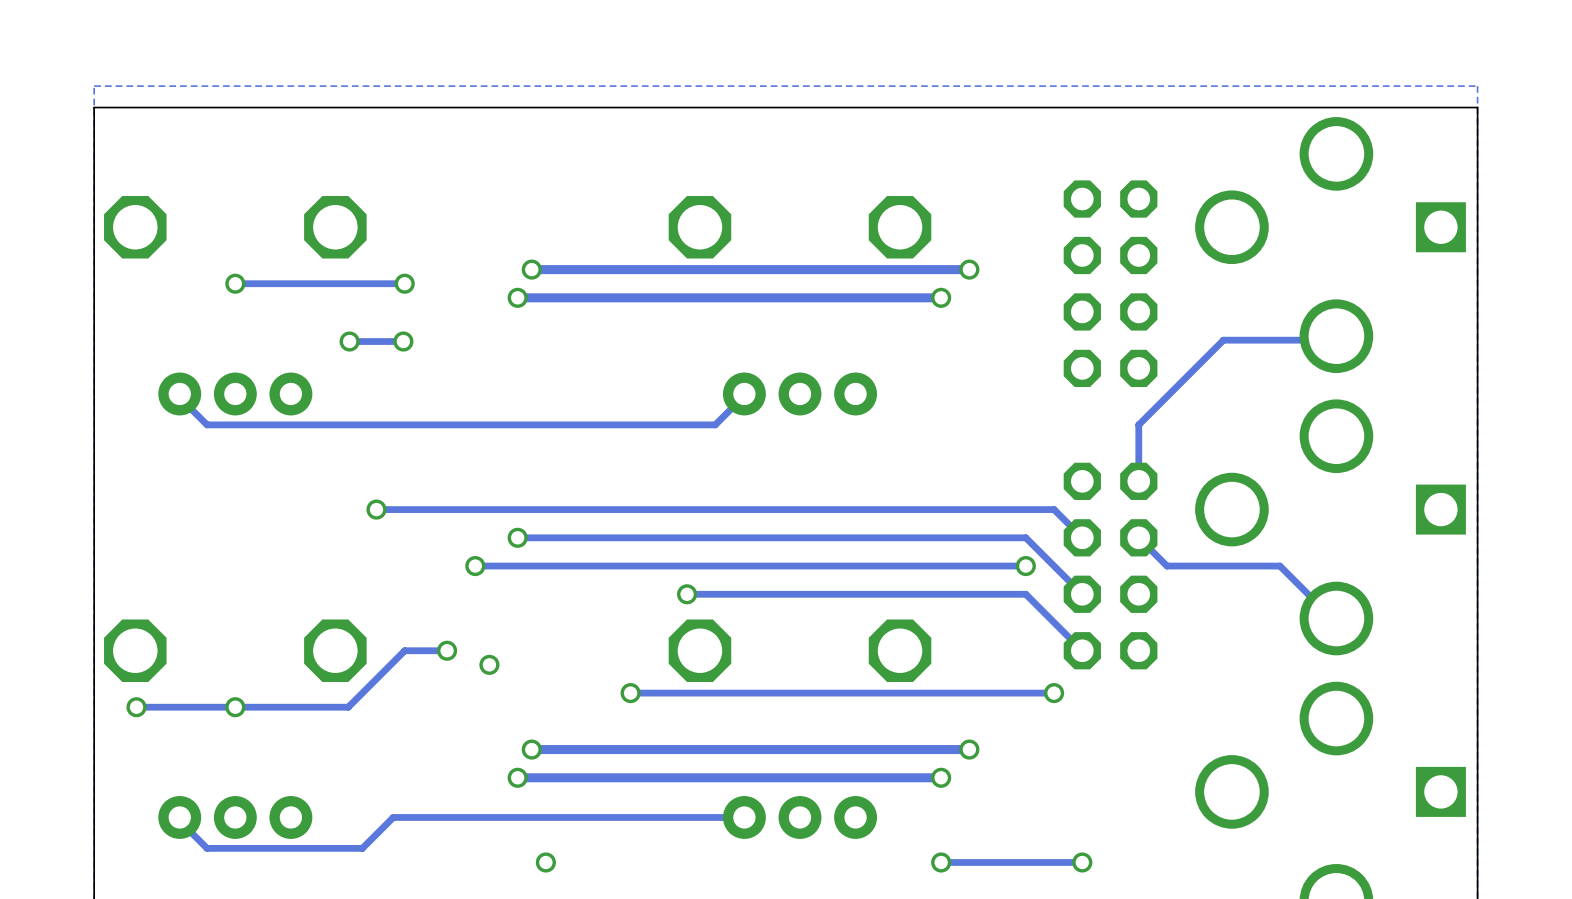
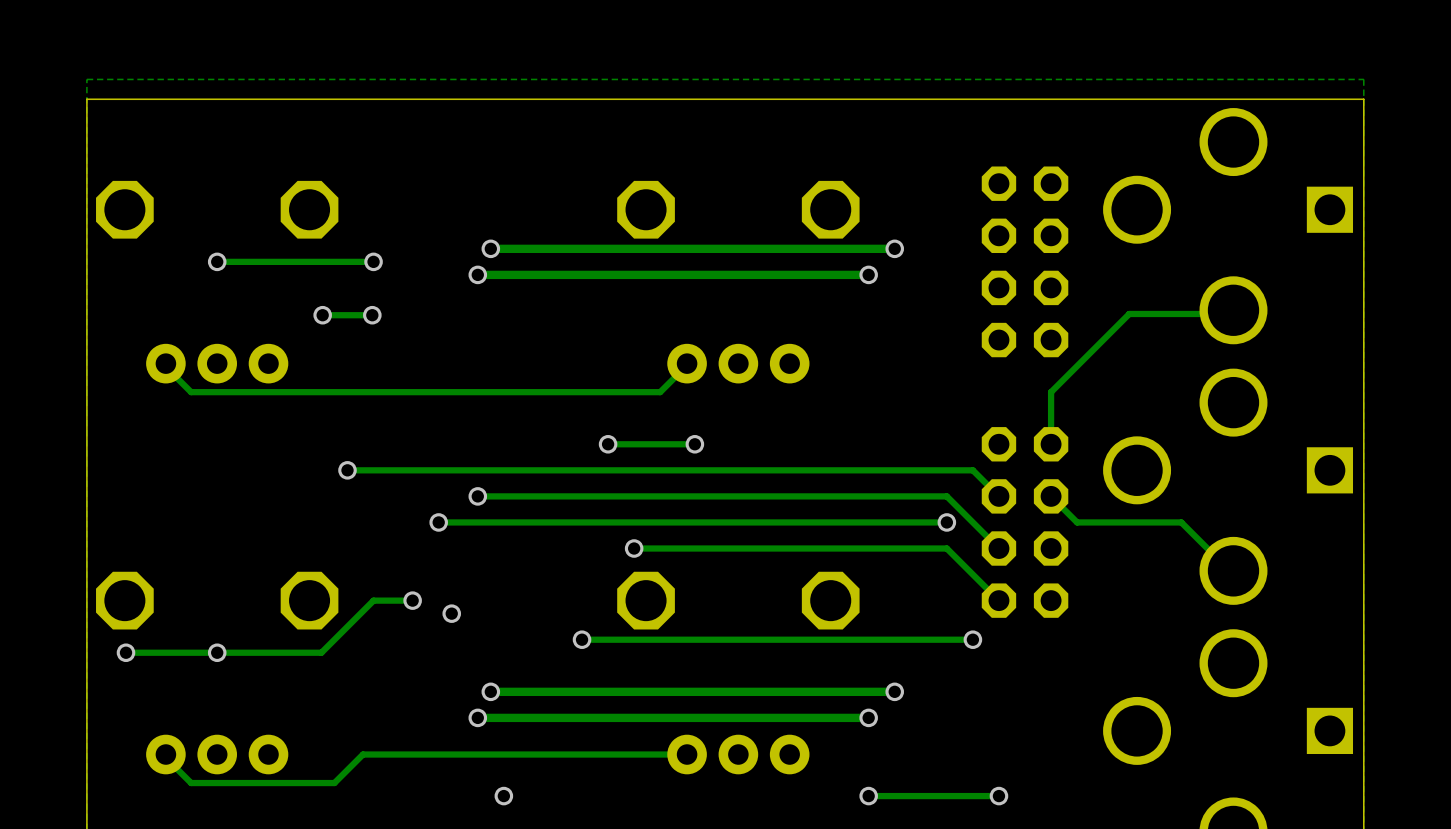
via: none -> (608, 444)
track: none -> (694, 444) (608, 444)
via: none -> (694, 444)

